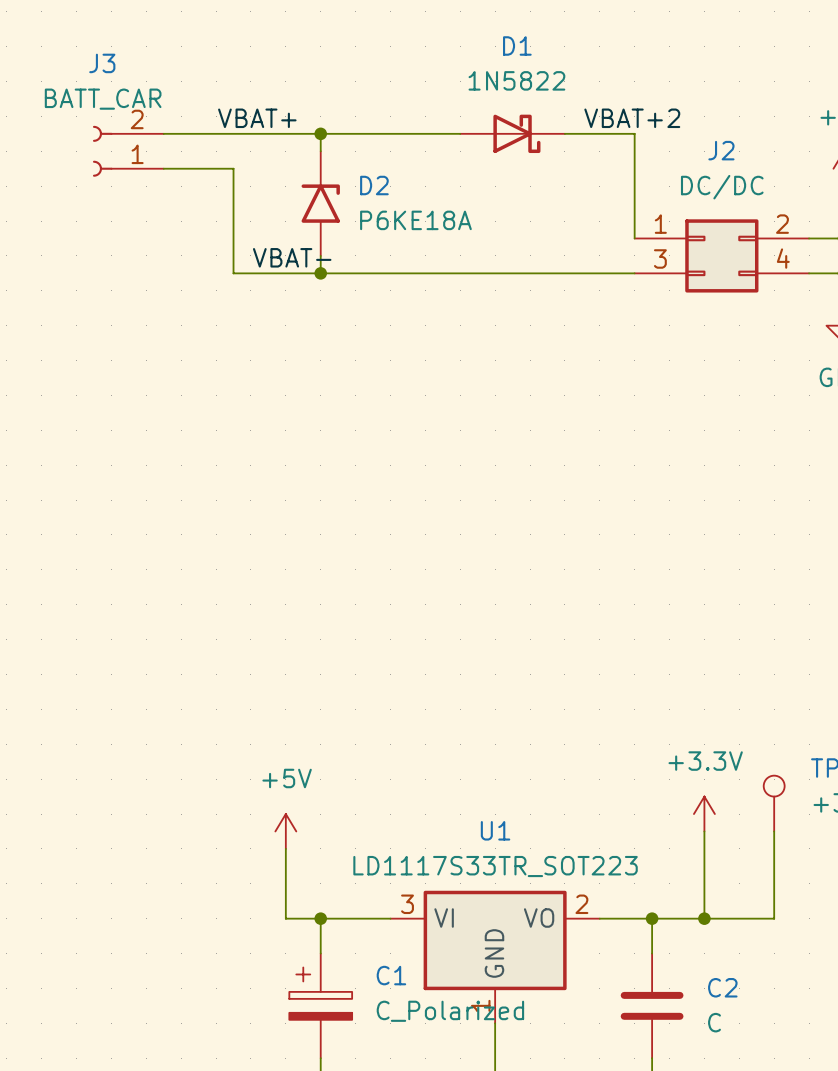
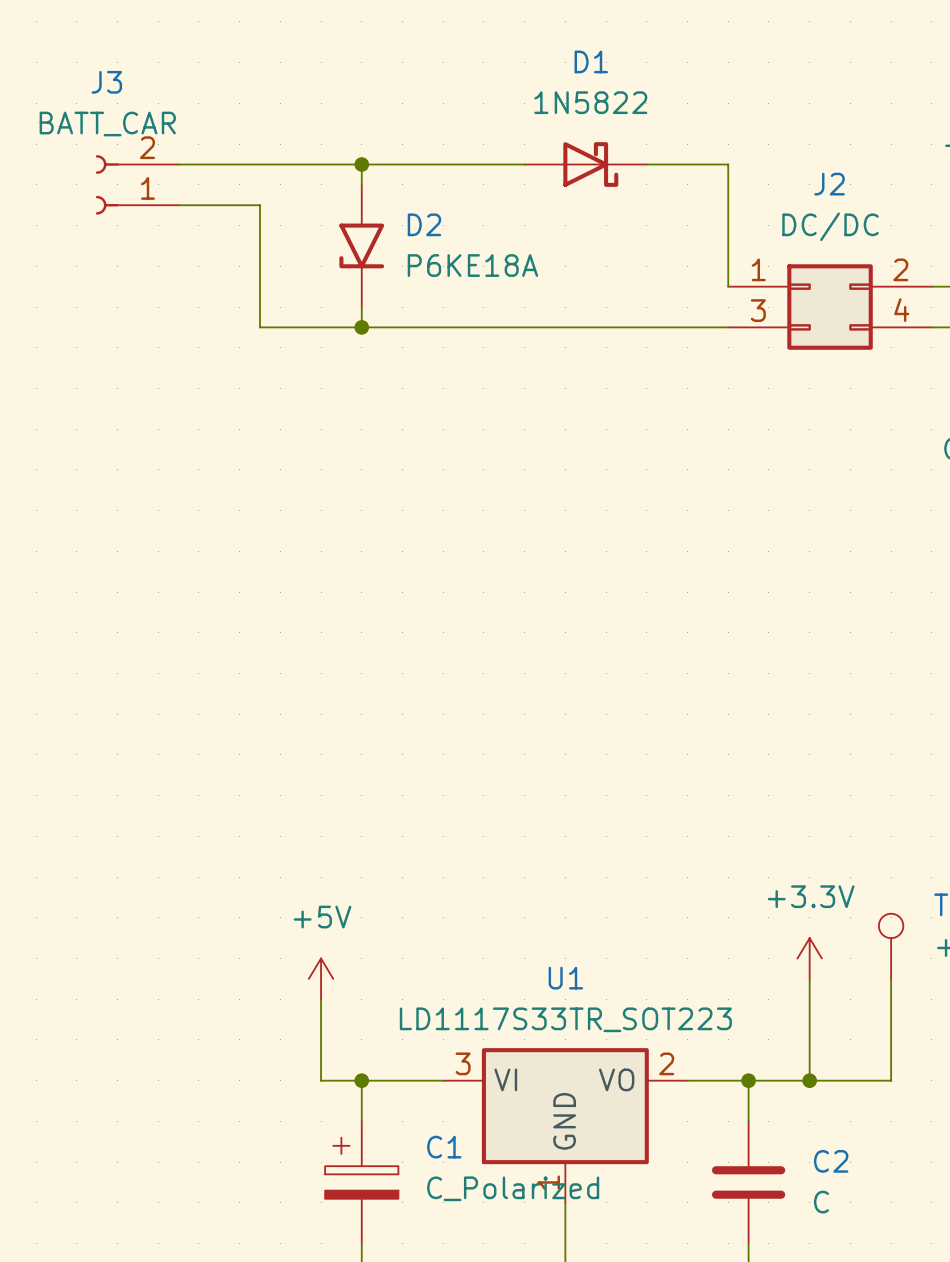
label: VBAT+ (257, 118) -> none
label: VBAT+2 (632, 118) -> none
D2 rotation: 0° (320, 203) -> 180° (361, 245)
label: VBAT- (292, 257) -> none

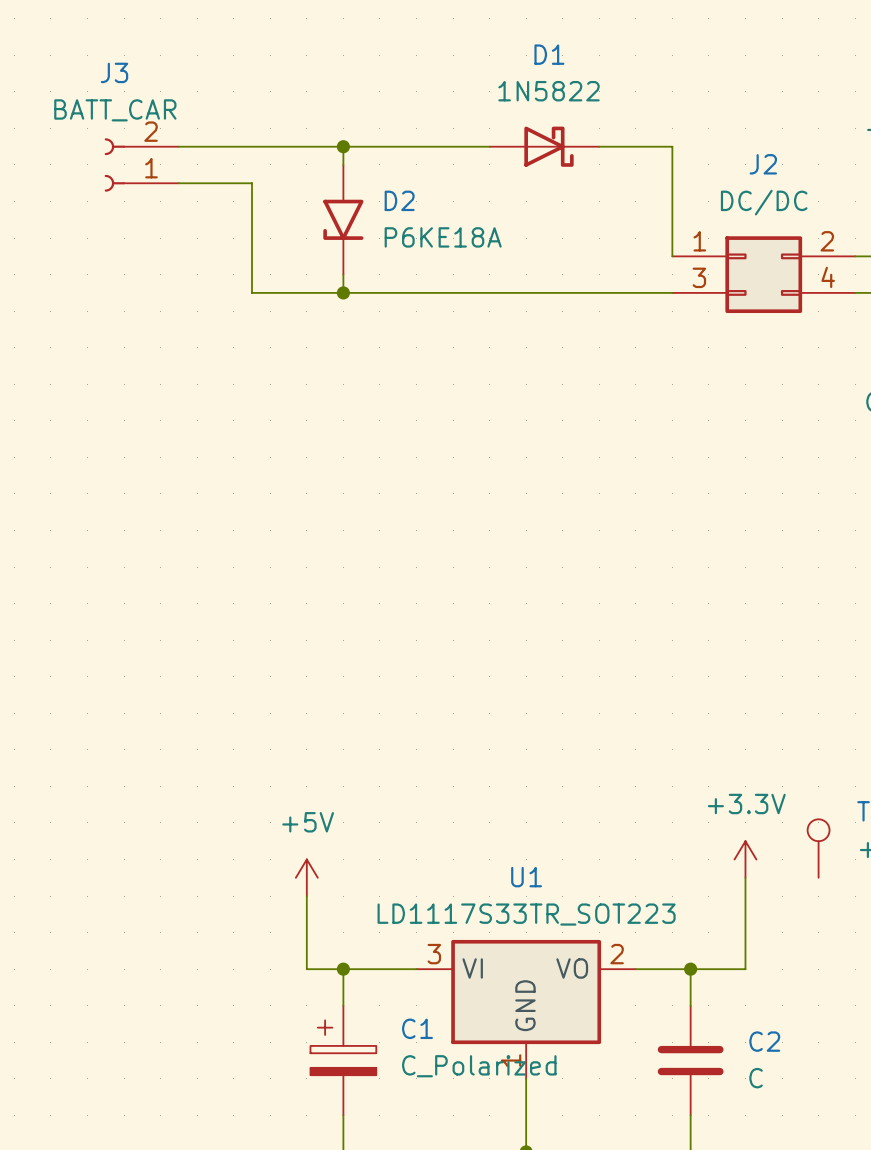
wire: (891, 978) (891, 1080) (809, 1080) -> none
junction: (809, 1080) -> none

